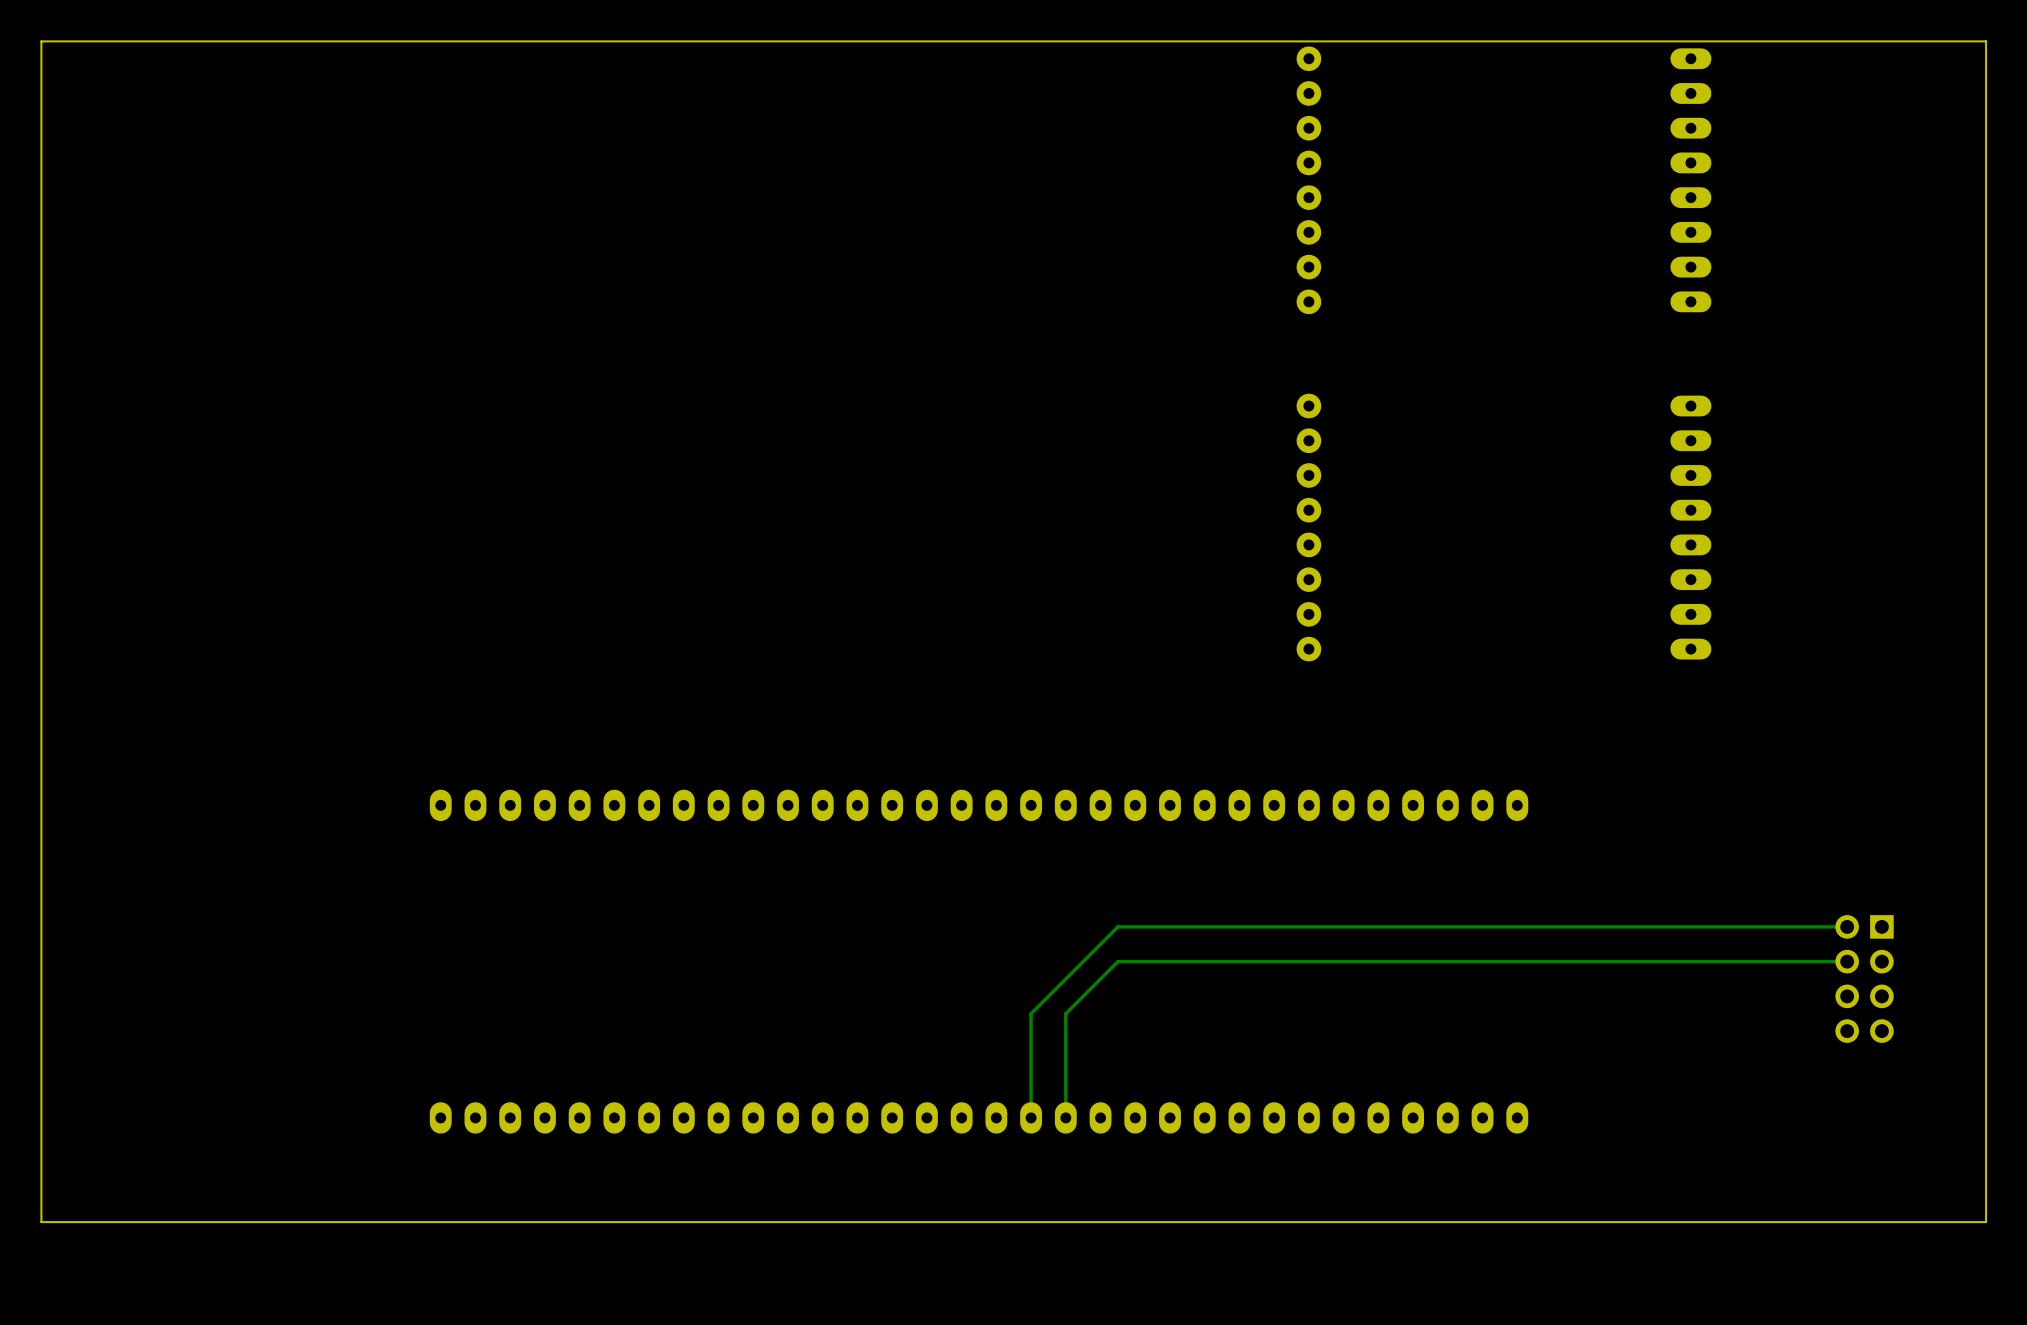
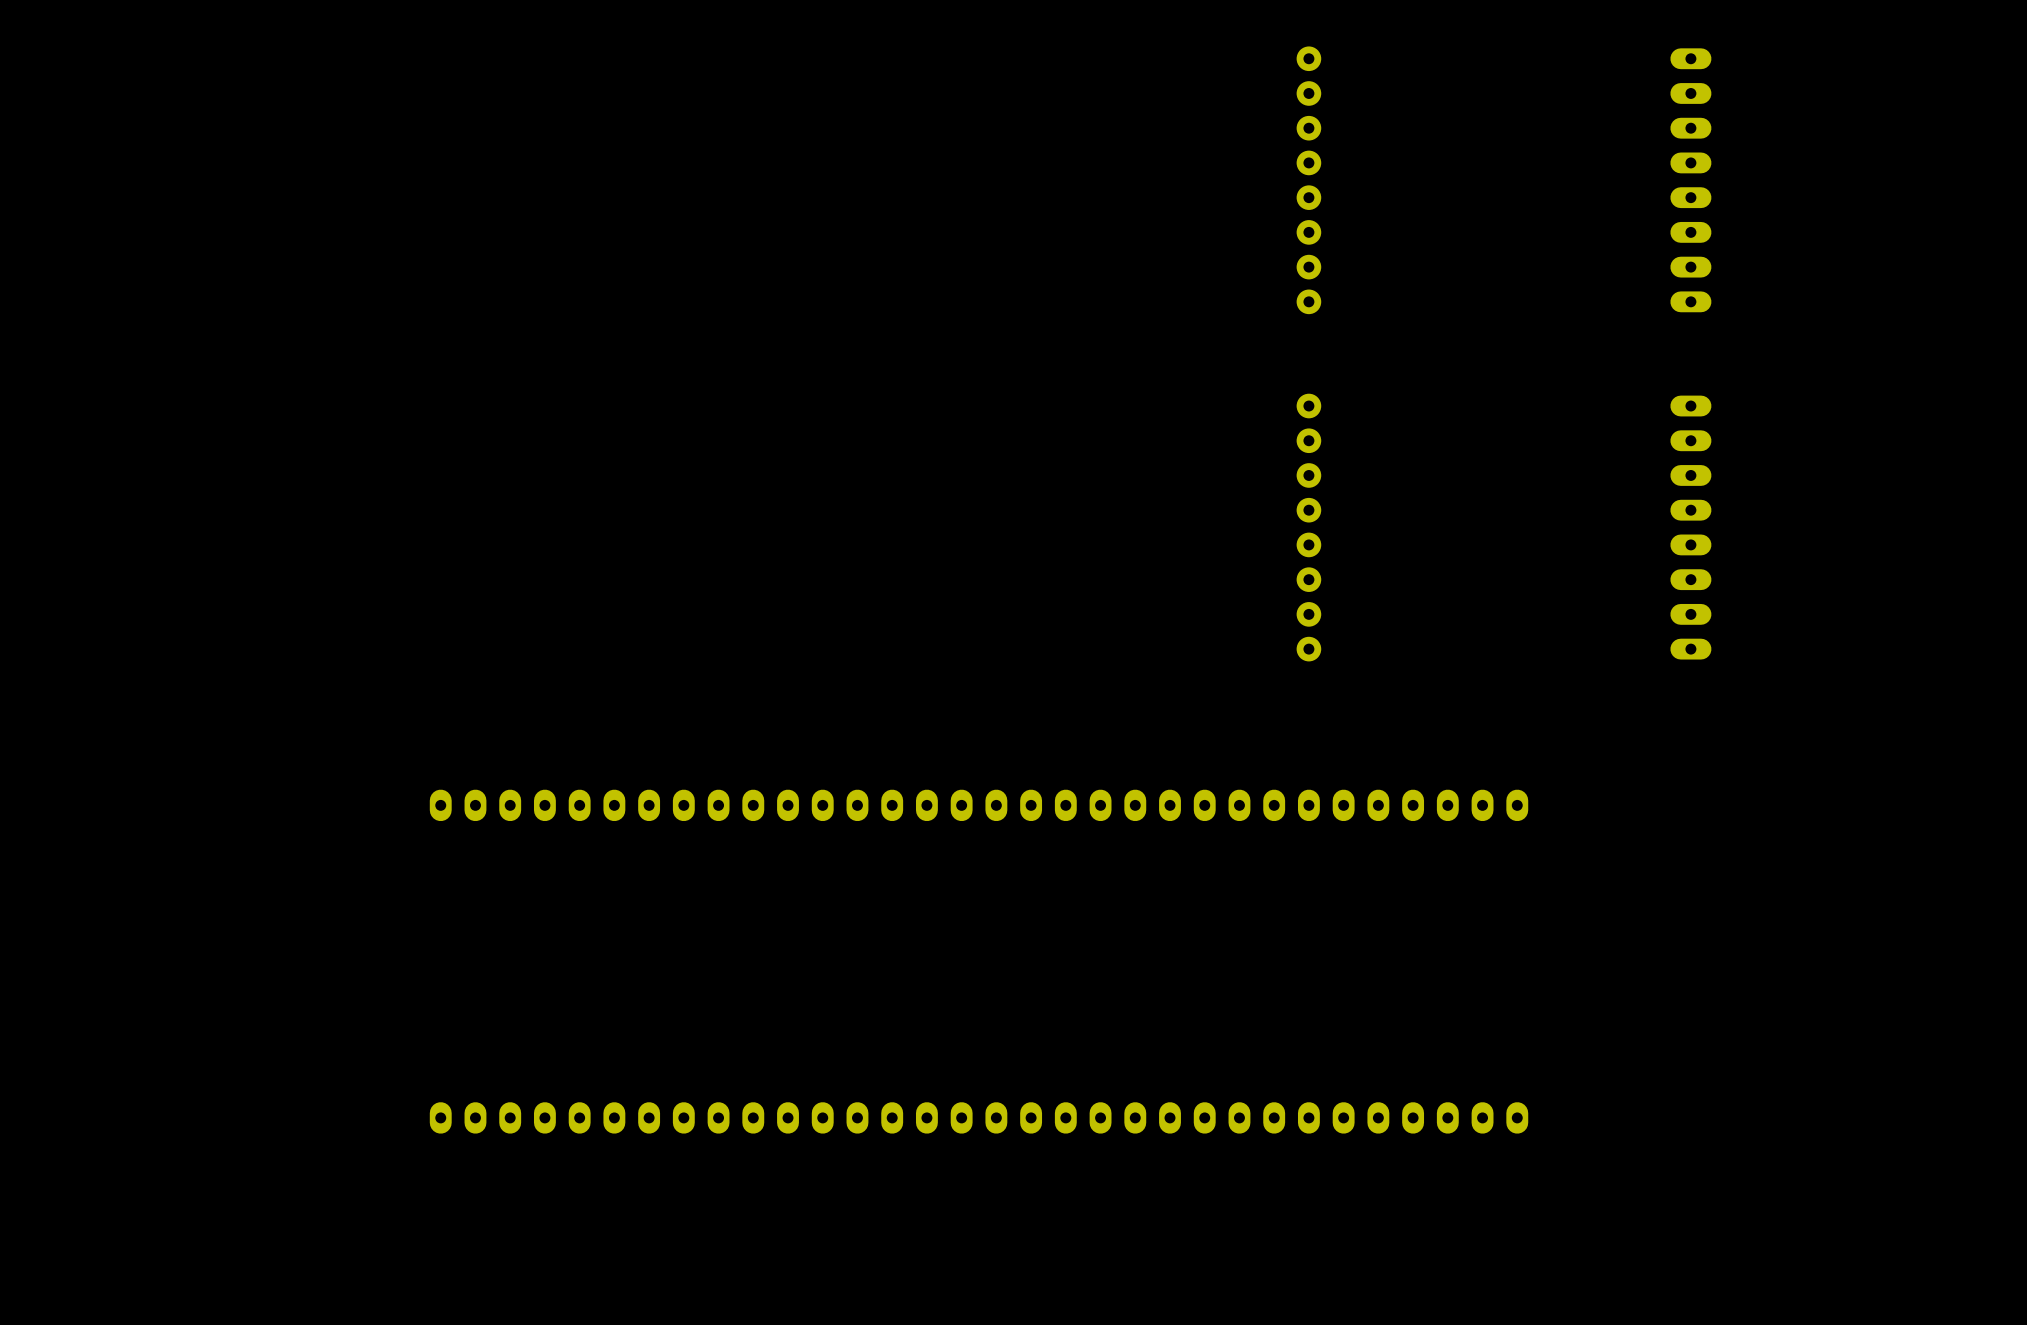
board edge: (1986, 41) (1986, 1222) (41, 1222) (41, 41) (1986, 41) -> none
track: (1847, 926) (1117, 926) (1031, 1013) (1031, 1117) -> none
track: (1847, 961) (1117, 961) (1065, 1013) (1065, 1117) -> none
part: (1864, 979) -> none

